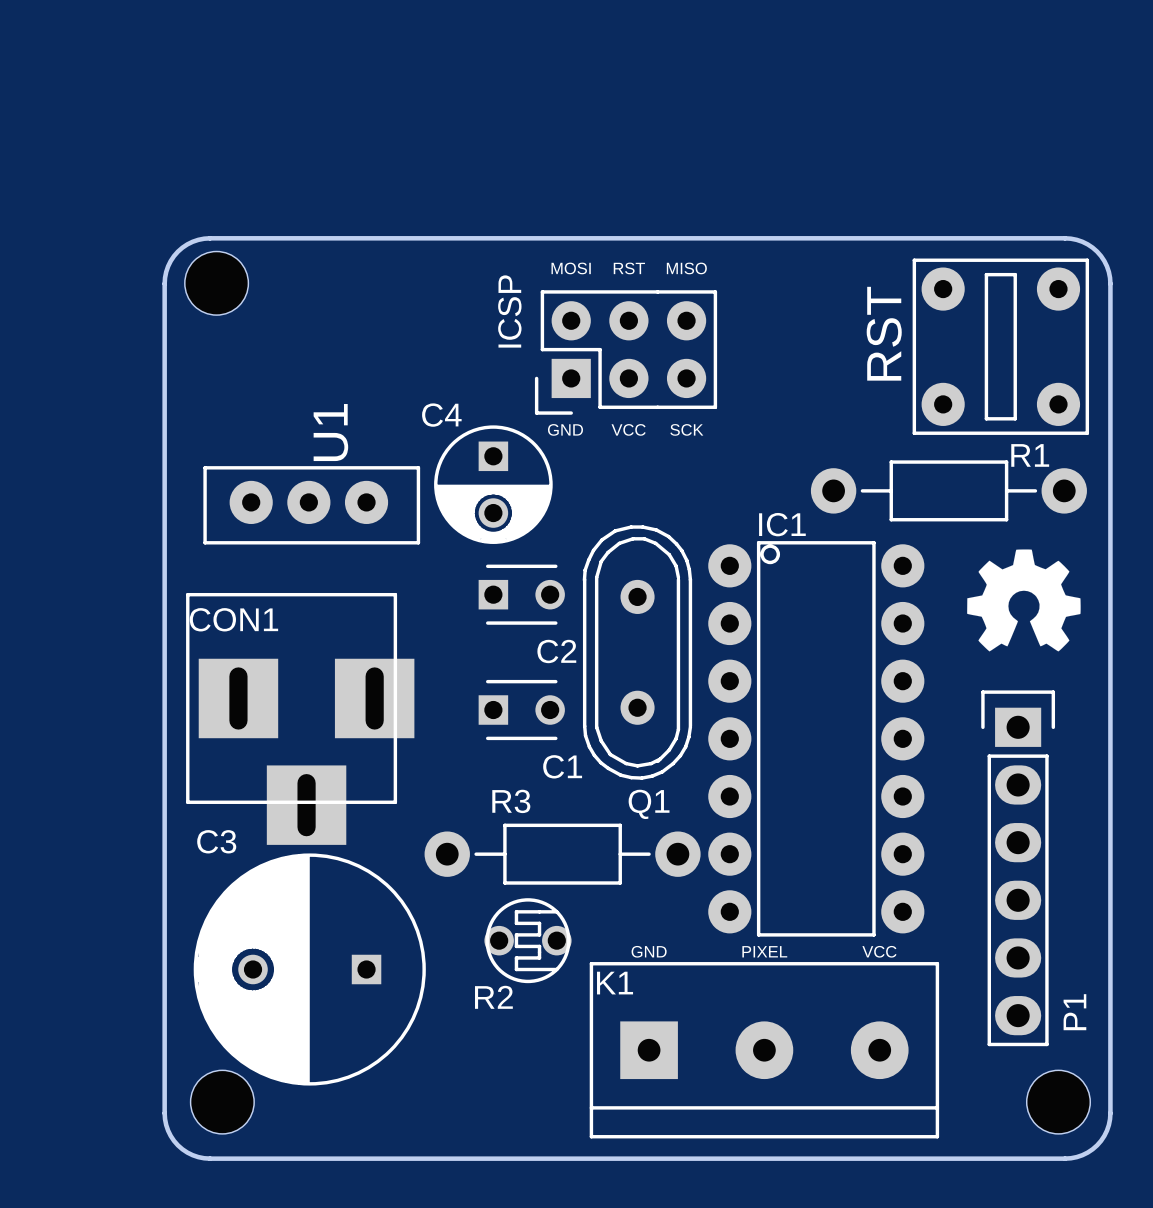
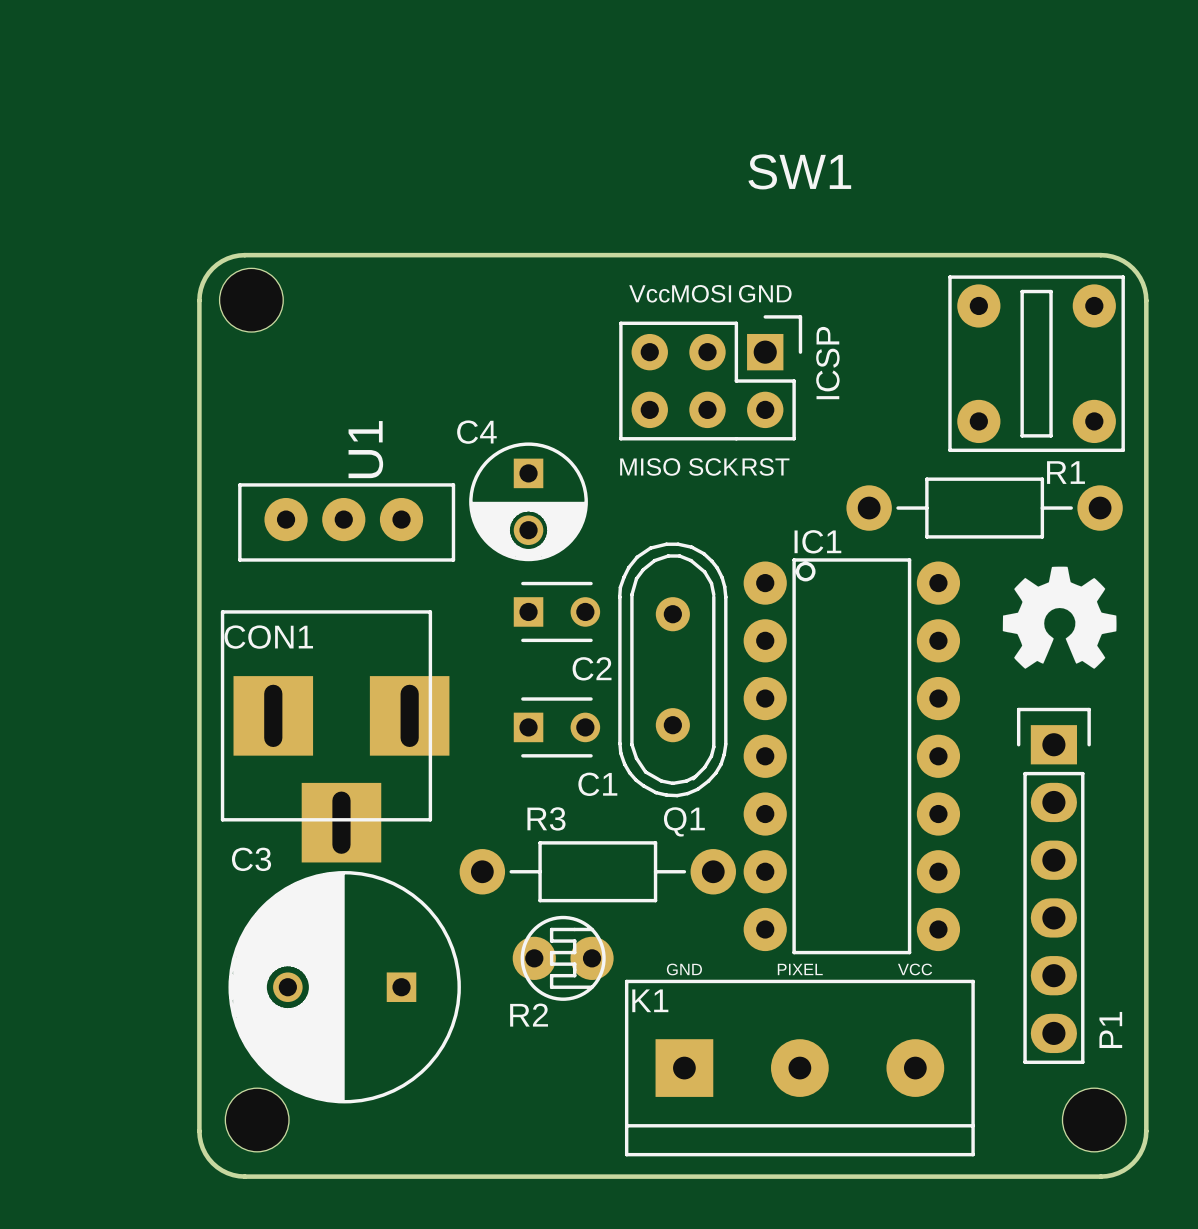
text: none -> MOSI (701, 293)
text: none -> GND (765, 293)
text: none -> Vcc (649, 293)
RST name: RST (884, 333) -> SW1 (799, 171)
ICSP: (626, 352) -> none
ICSP: none -> (710, 377)
text: none -> MISO (650, 466)
text: none -> SCK (713, 466)
text: none -> RST (765, 466)
R2 footprint: [484, 898, 572, 984] -> [512, 915, 614, 1001]

